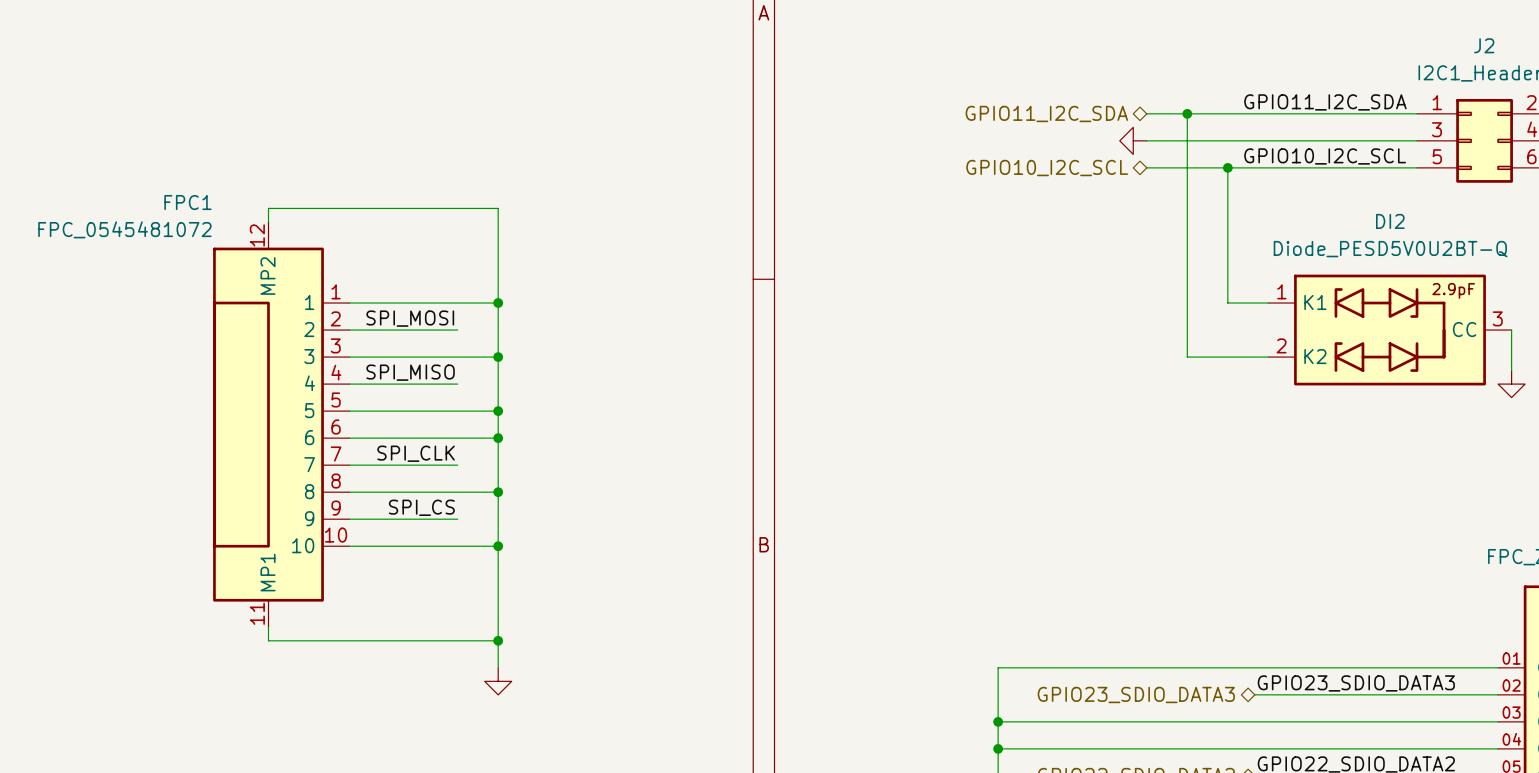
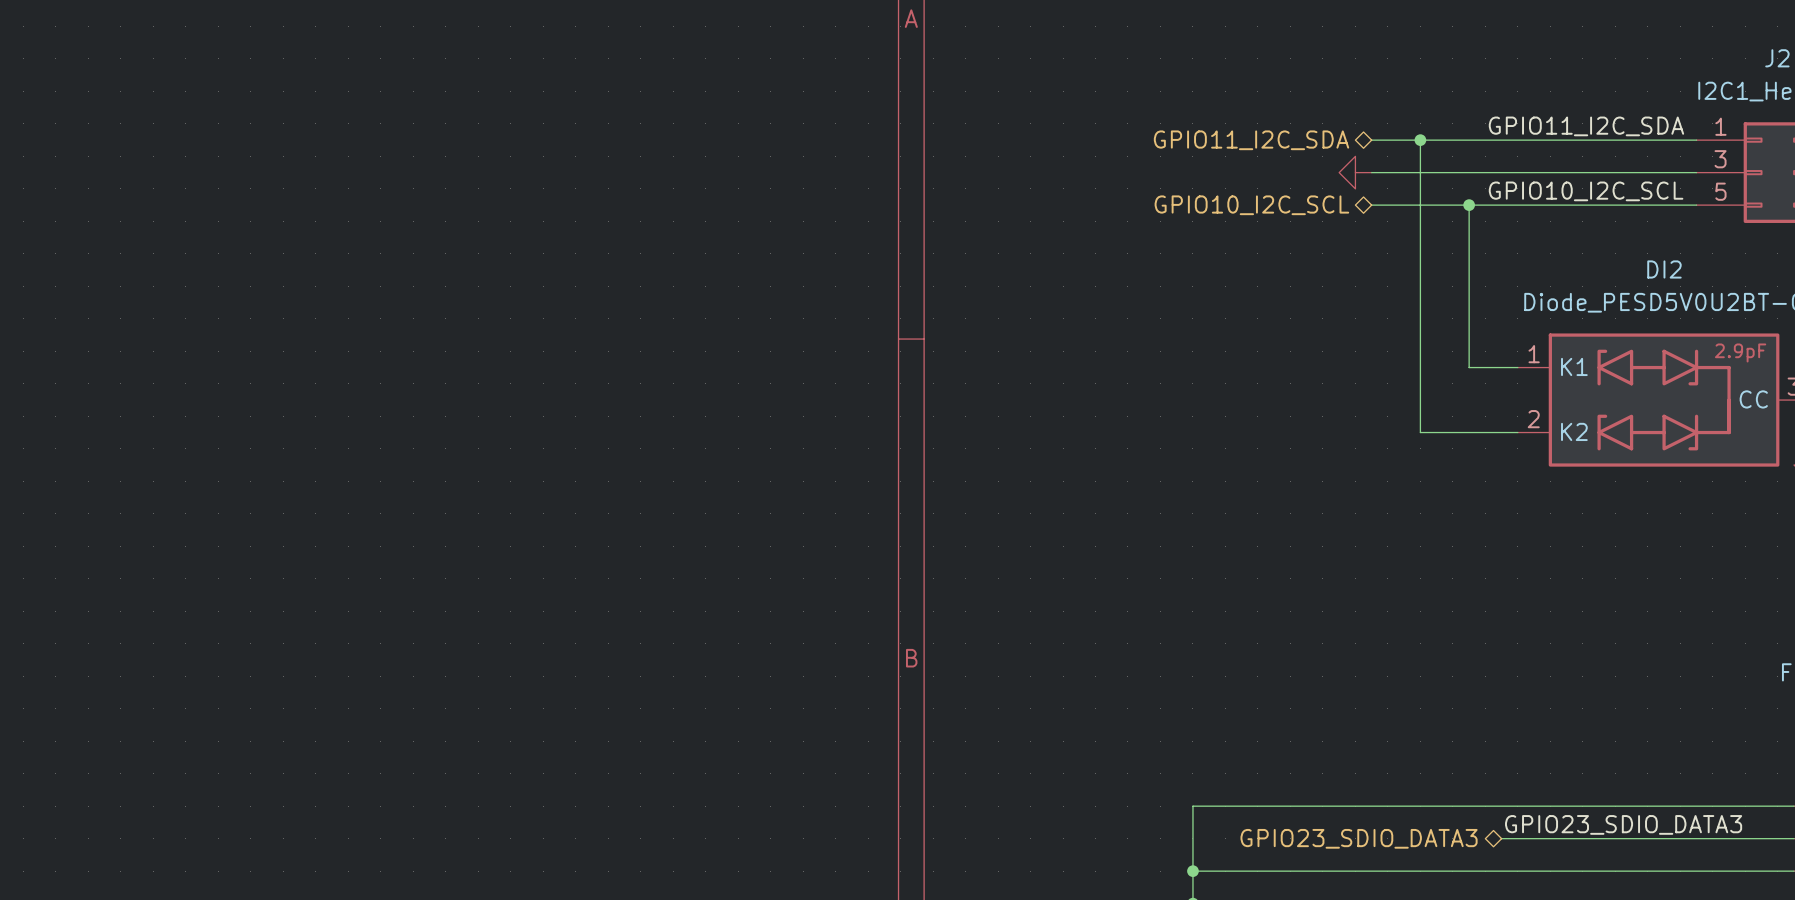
wire: (268, 221) (268, 208) (498, 208) (498, 667) -> none
wire: (349, 303) (498, 303) -> none
junction: (498, 303) -> none
label: SPI_MOSI (410, 318) -> none
wire: (349, 330) (457, 330) -> none
wire: (349, 357) (498, 357) -> none
junction: (498, 357) -> none
label: SPI_MISO (410, 372) -> none
wire: (349, 384) (457, 384) -> none
wire: (349, 411) (498, 411) -> none
junction: (498, 411) -> none
FPC1: FPC_0545481072 (281, 424) -> none
wire: (349, 438) (498, 438) -> none
junction: (498, 438) -> none
label: SPI_CLK (416, 453) -> none
wire: (349, 465) (457, 465) -> none
wire: (349, 492) (498, 492) -> none
junction: (498, 492) -> none
label: SPI_CS (421, 507) -> none
wire: (349, 519) (457, 519) -> none
wire: (349, 546) (498, 546) -> none
junction: (498, 546) -> none
wire: (268, 627) (268, 640) (498, 640) -> none
junction: (498, 640) -> none
power symbol: (498, 681) -> none

